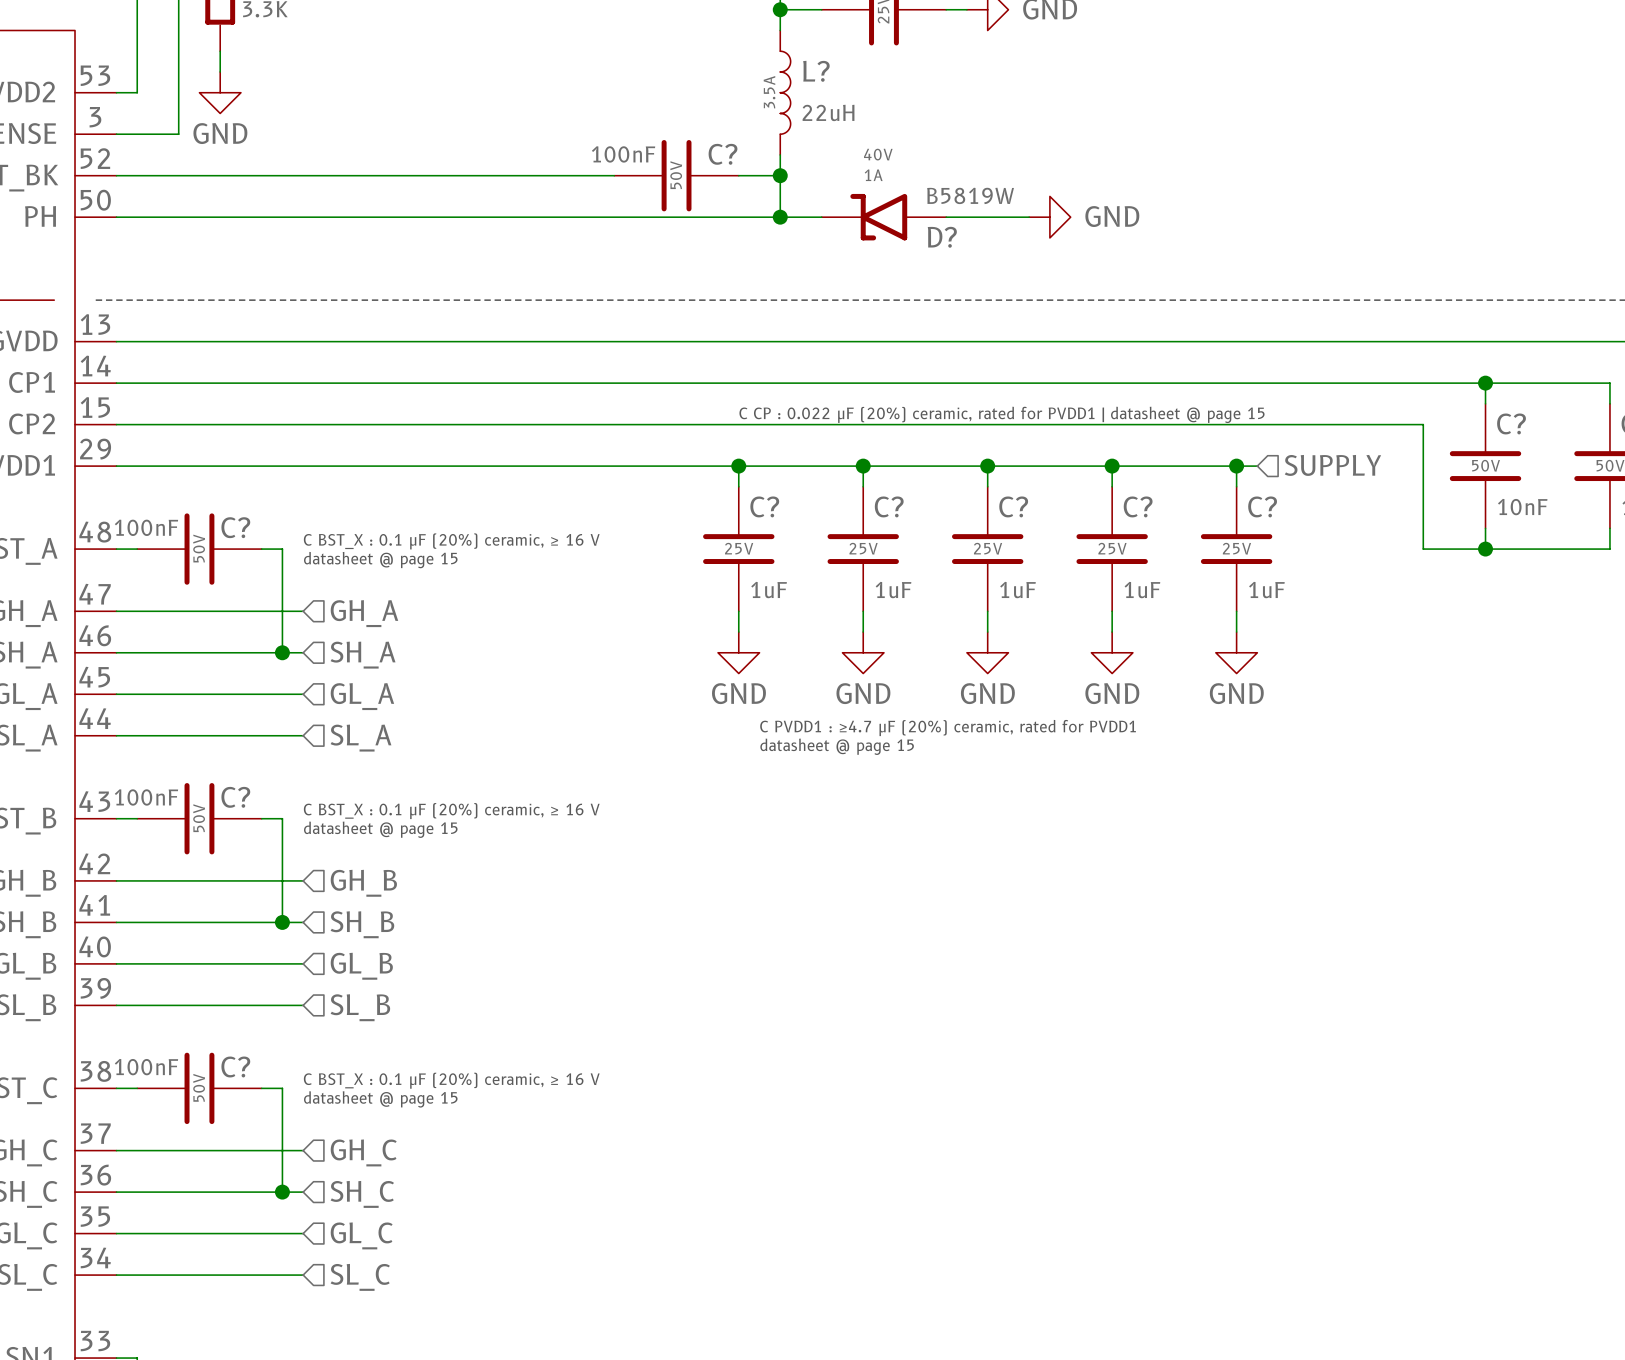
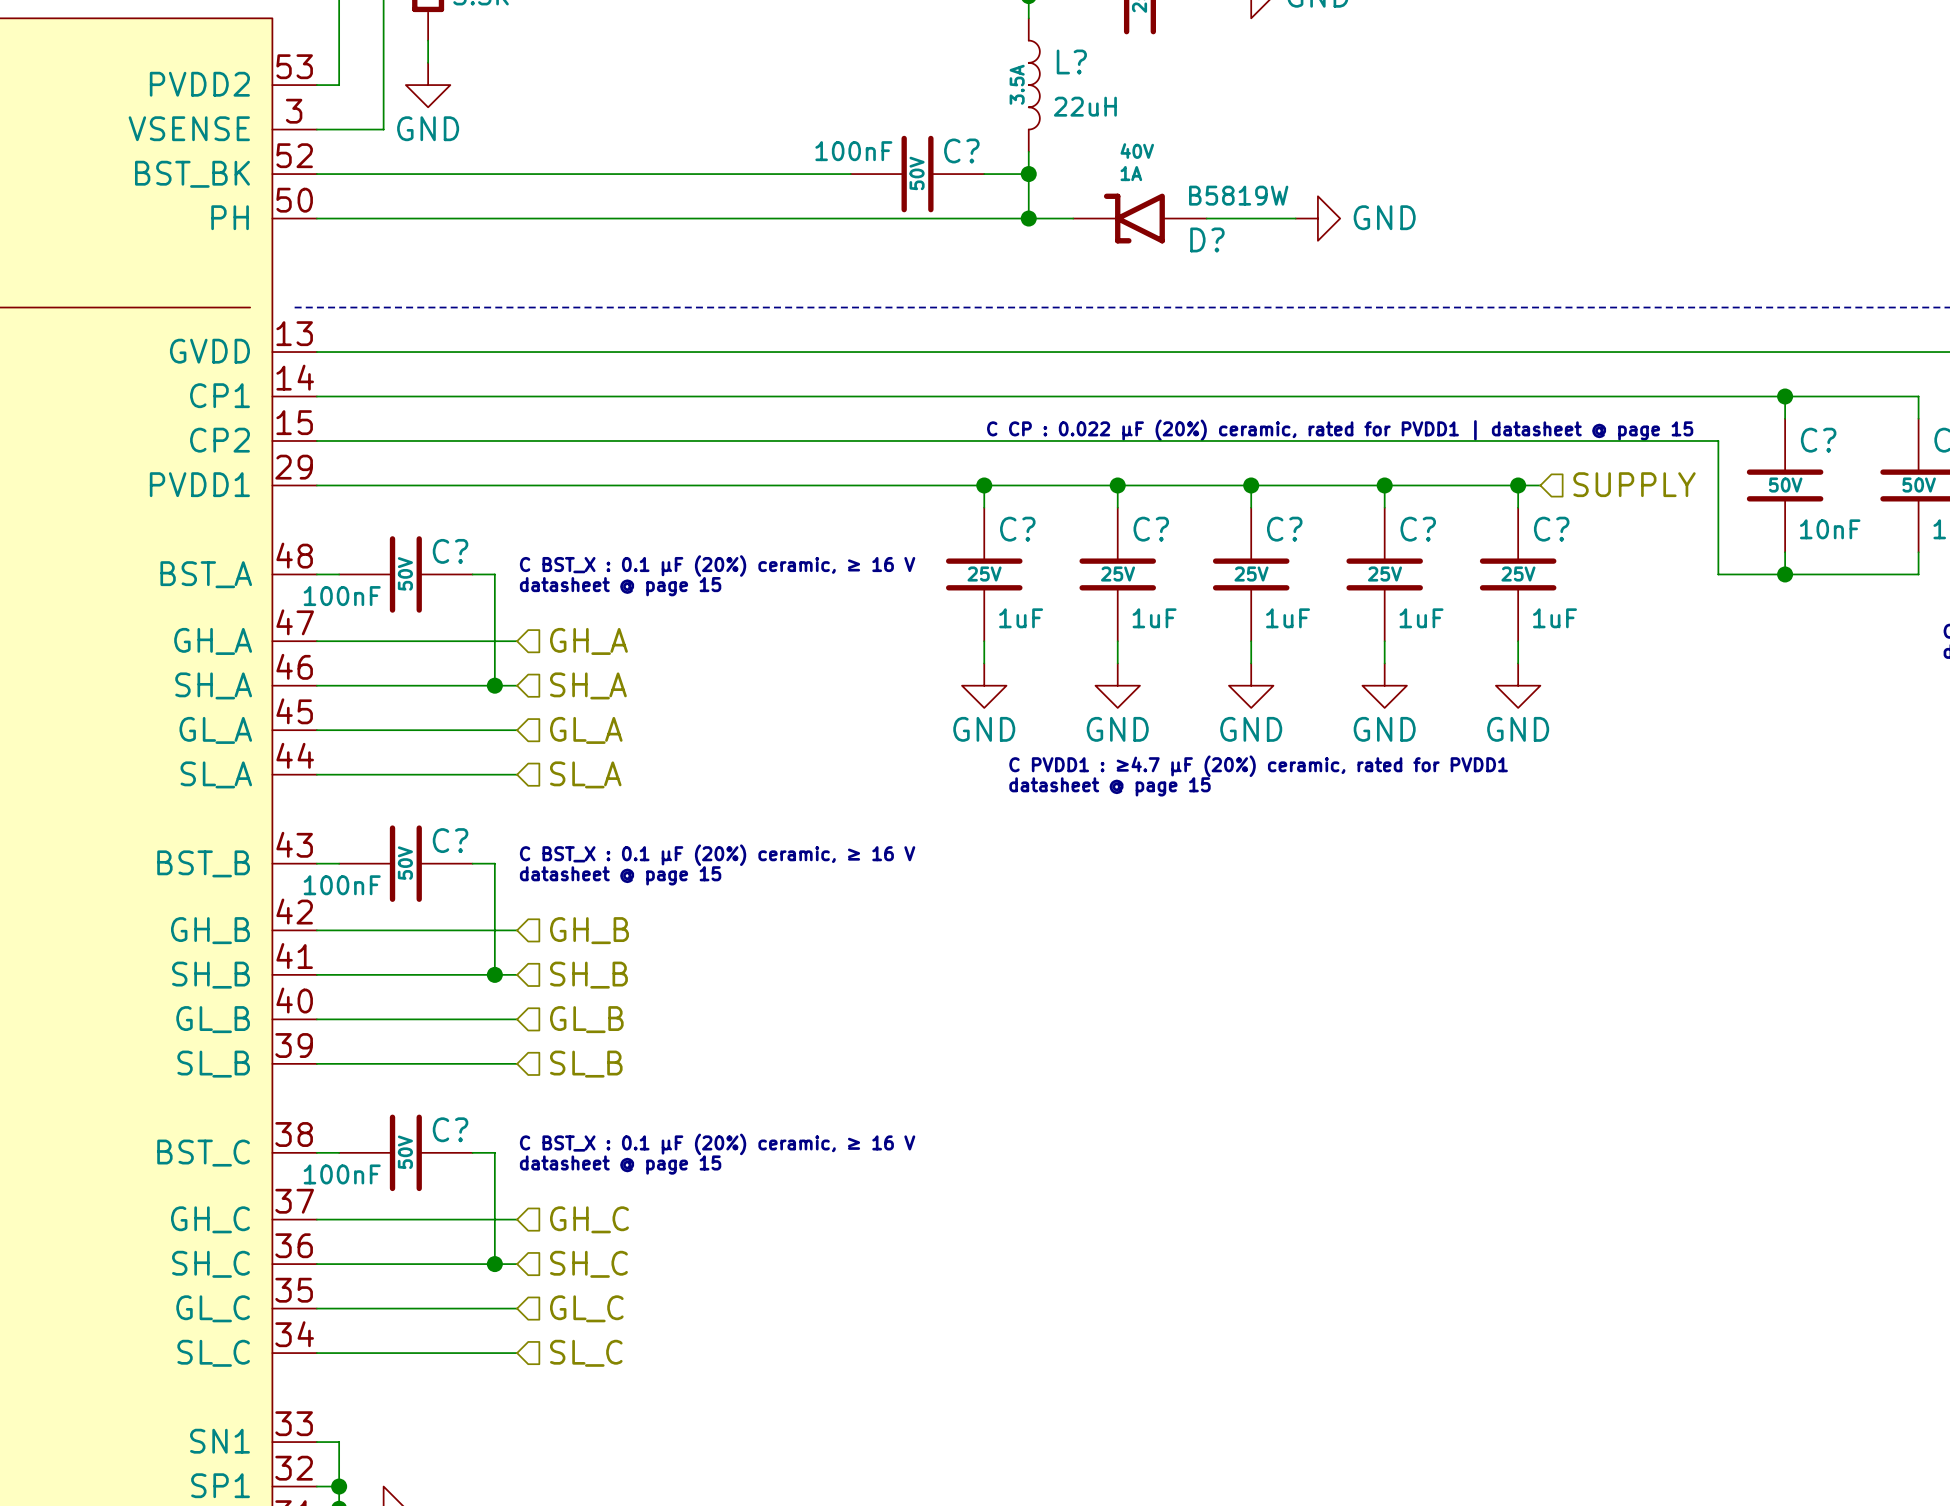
C? value position: 100nF (146, 527) -> 100nF (342, 596)
C? value position: 100nF (146, 797) -> 100nF (342, 885)
C? value position: 100nF (146, 1067) -> 100nF (342, 1174)

